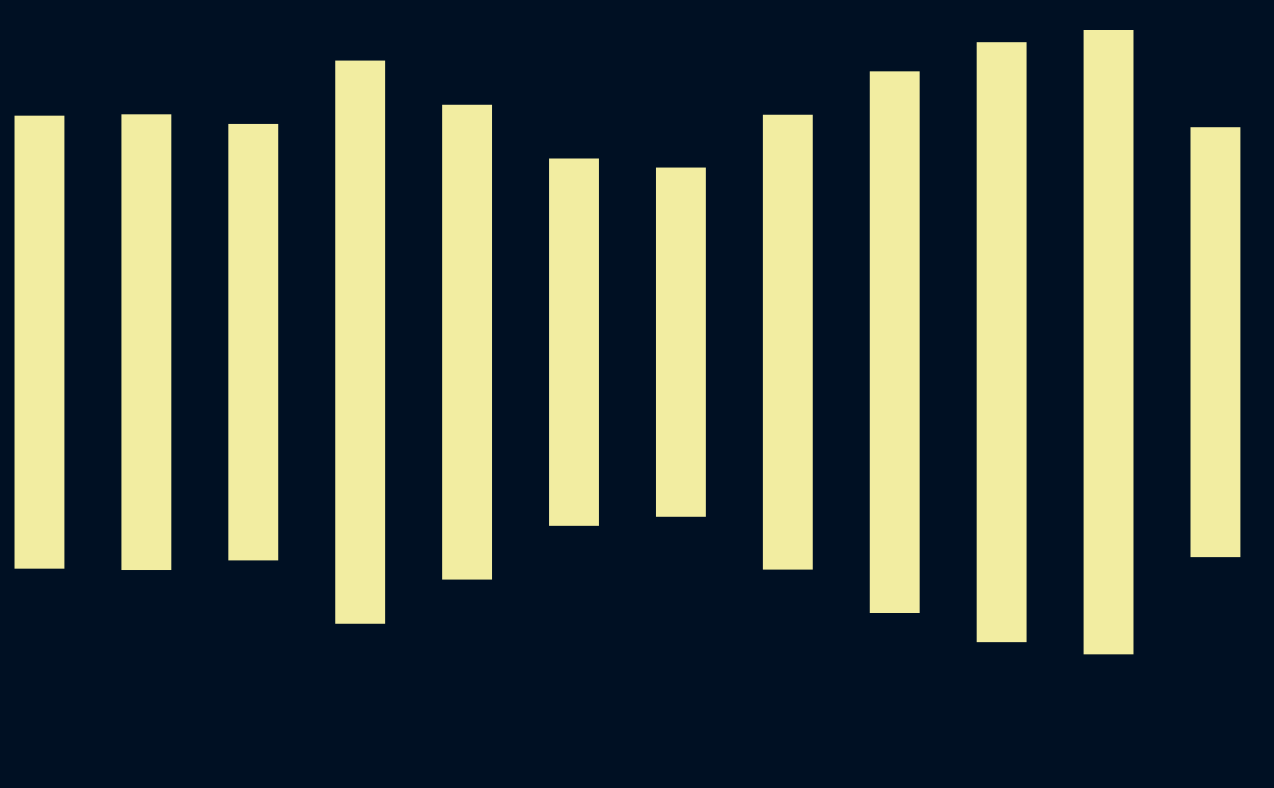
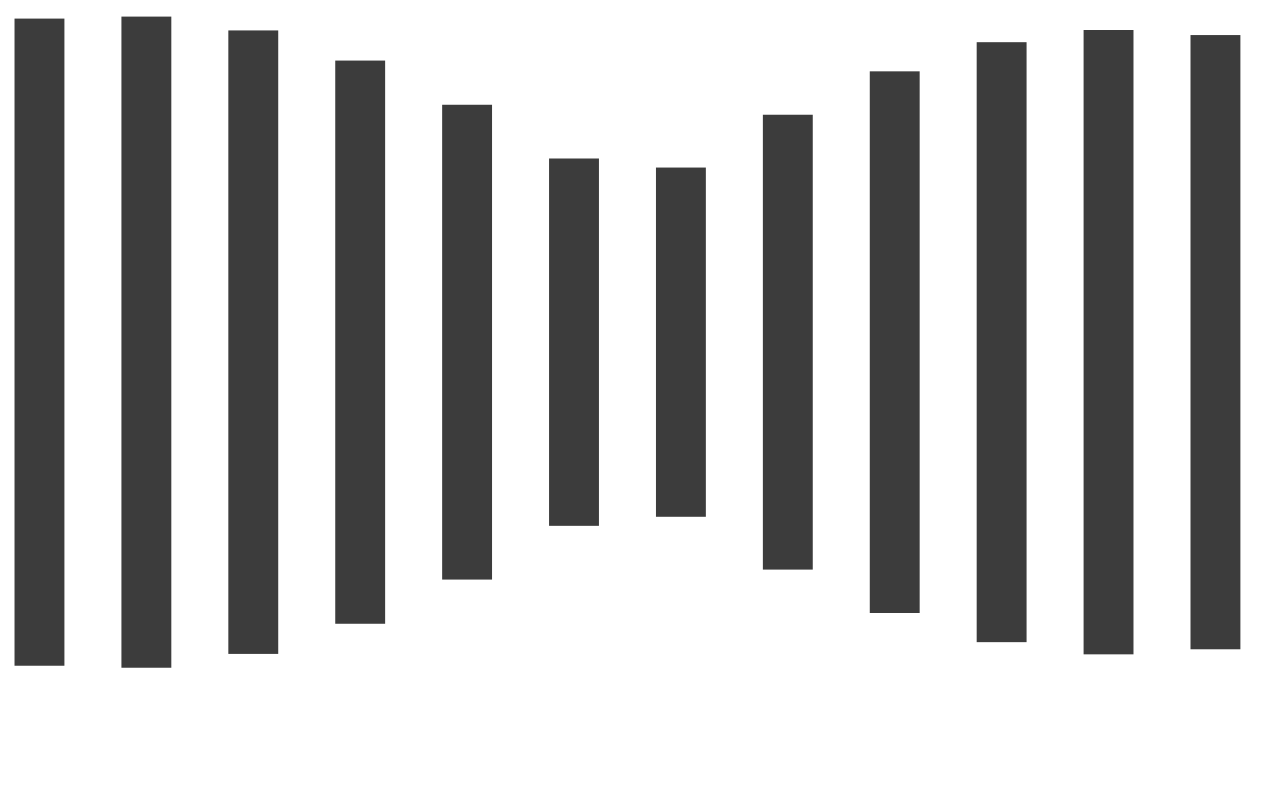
drawing shape: [121, 114, 172, 571] -> [121, 16, 172, 668]
drawing shape: [14, 115, 65, 569] -> [14, 18, 65, 666]
drawing shape: [228, 123, 279, 561] -> [228, 30, 279, 654]
drawing shape: [1190, 127, 1241, 558] -> [1190, 35, 1241, 650]

